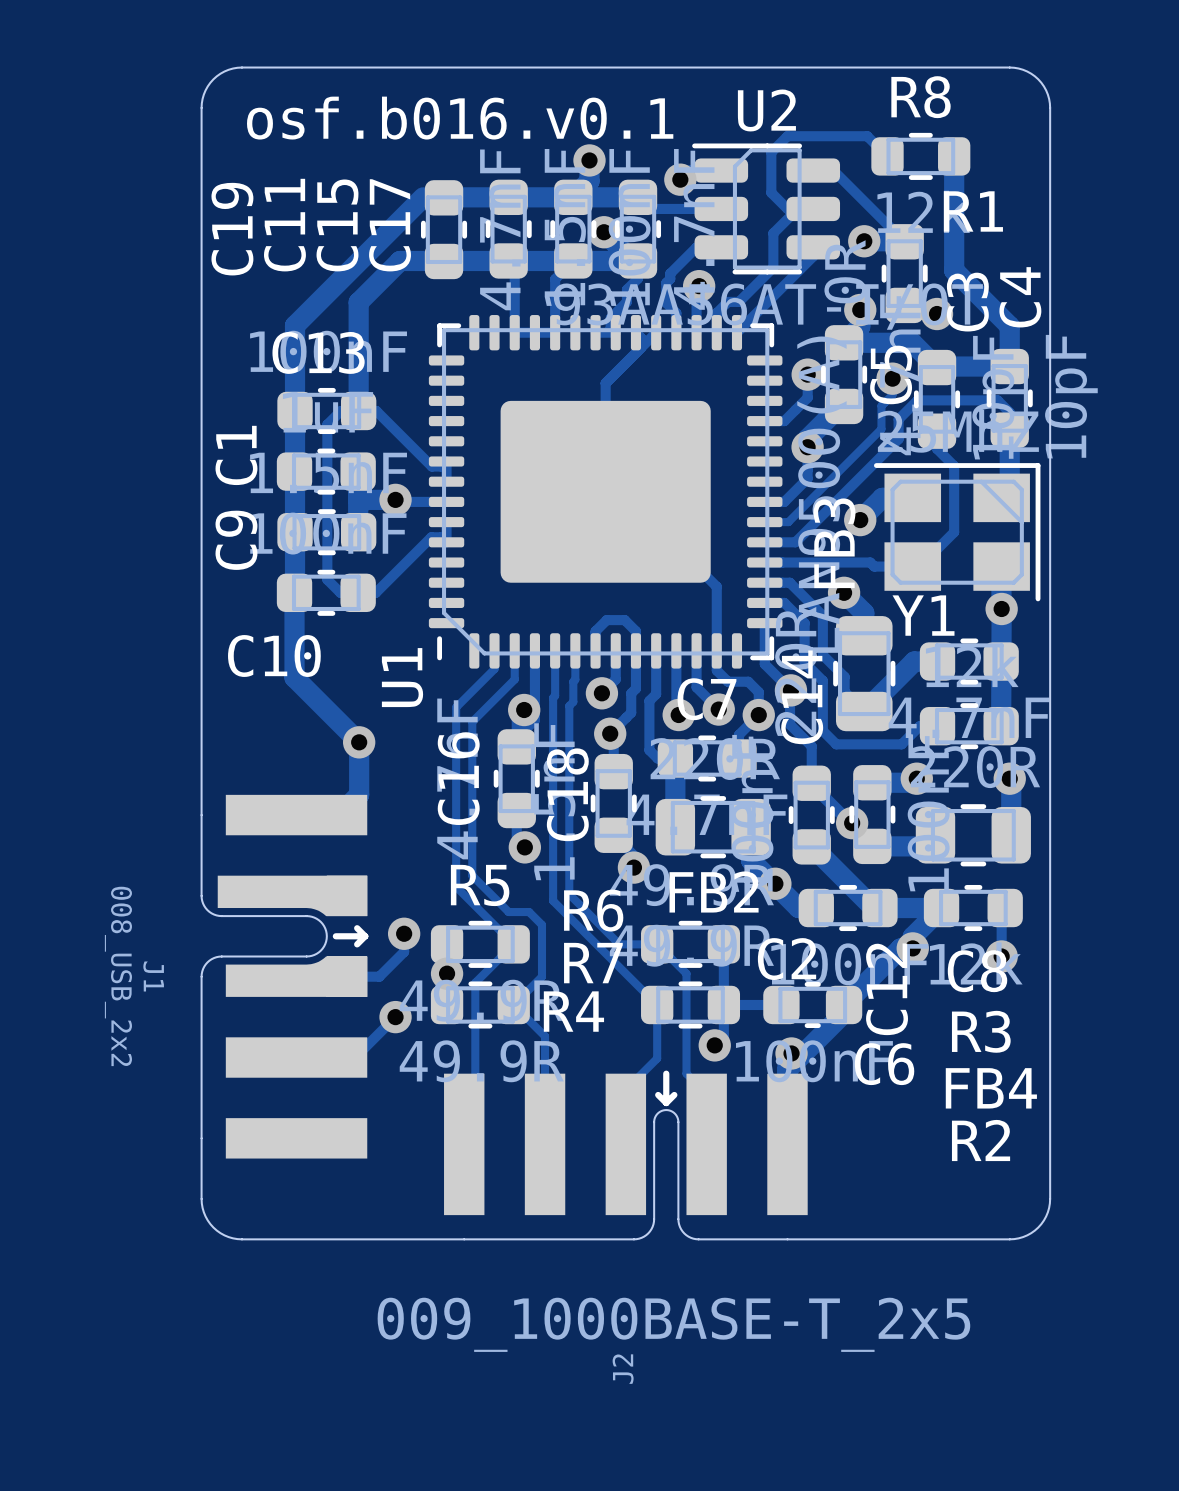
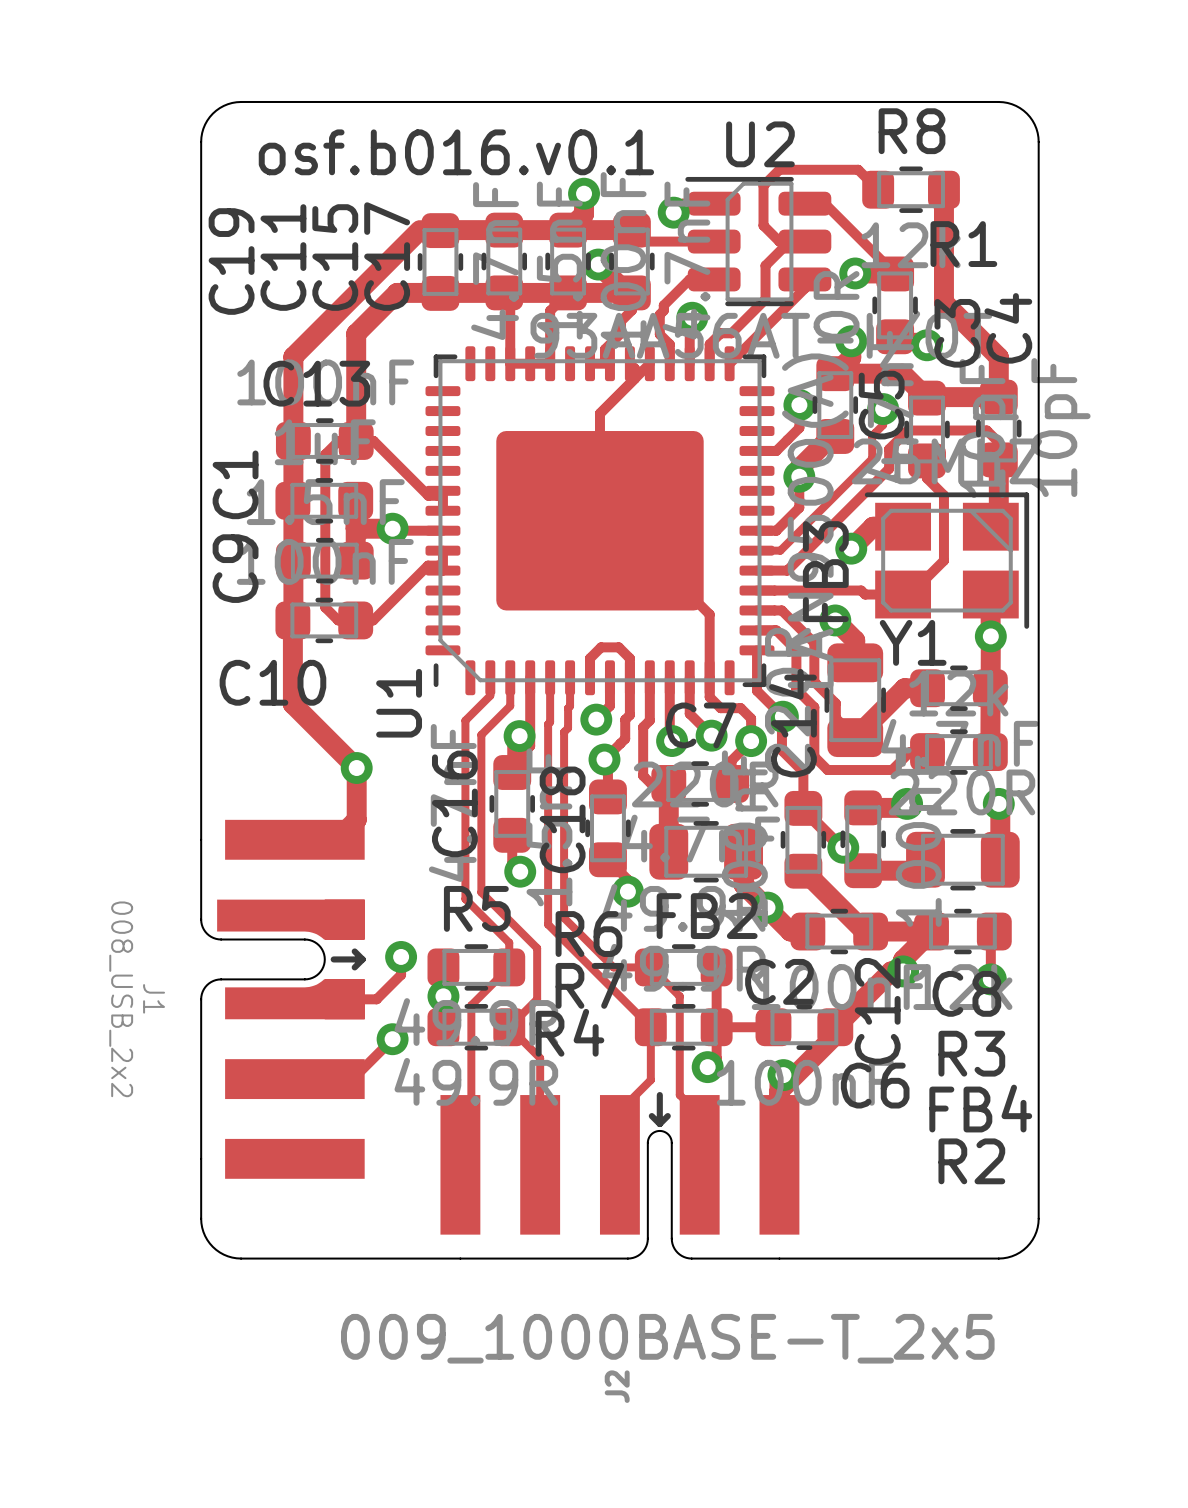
track: (514, 679) (472, 721) (472, 875) (508, 912) (529, 912) -> (510, 705) (481, 734) (481, 892) (524, 935)
track: (469, 694) (456, 707) (456, 886) (513, 944) -> (465, 720) (465, 899) (509, 942) (509, 967)

